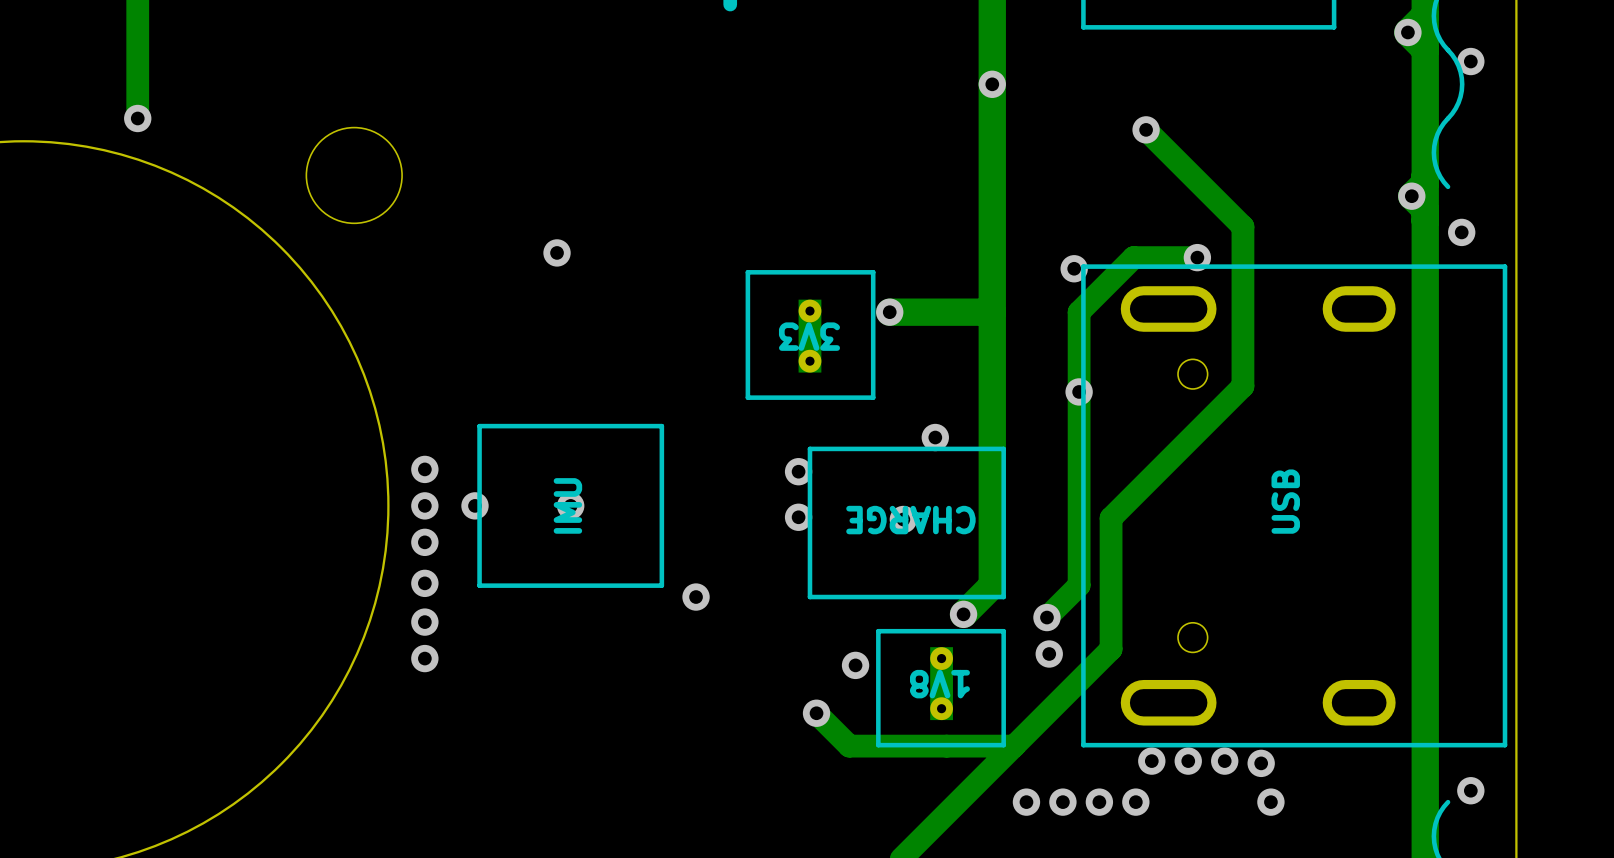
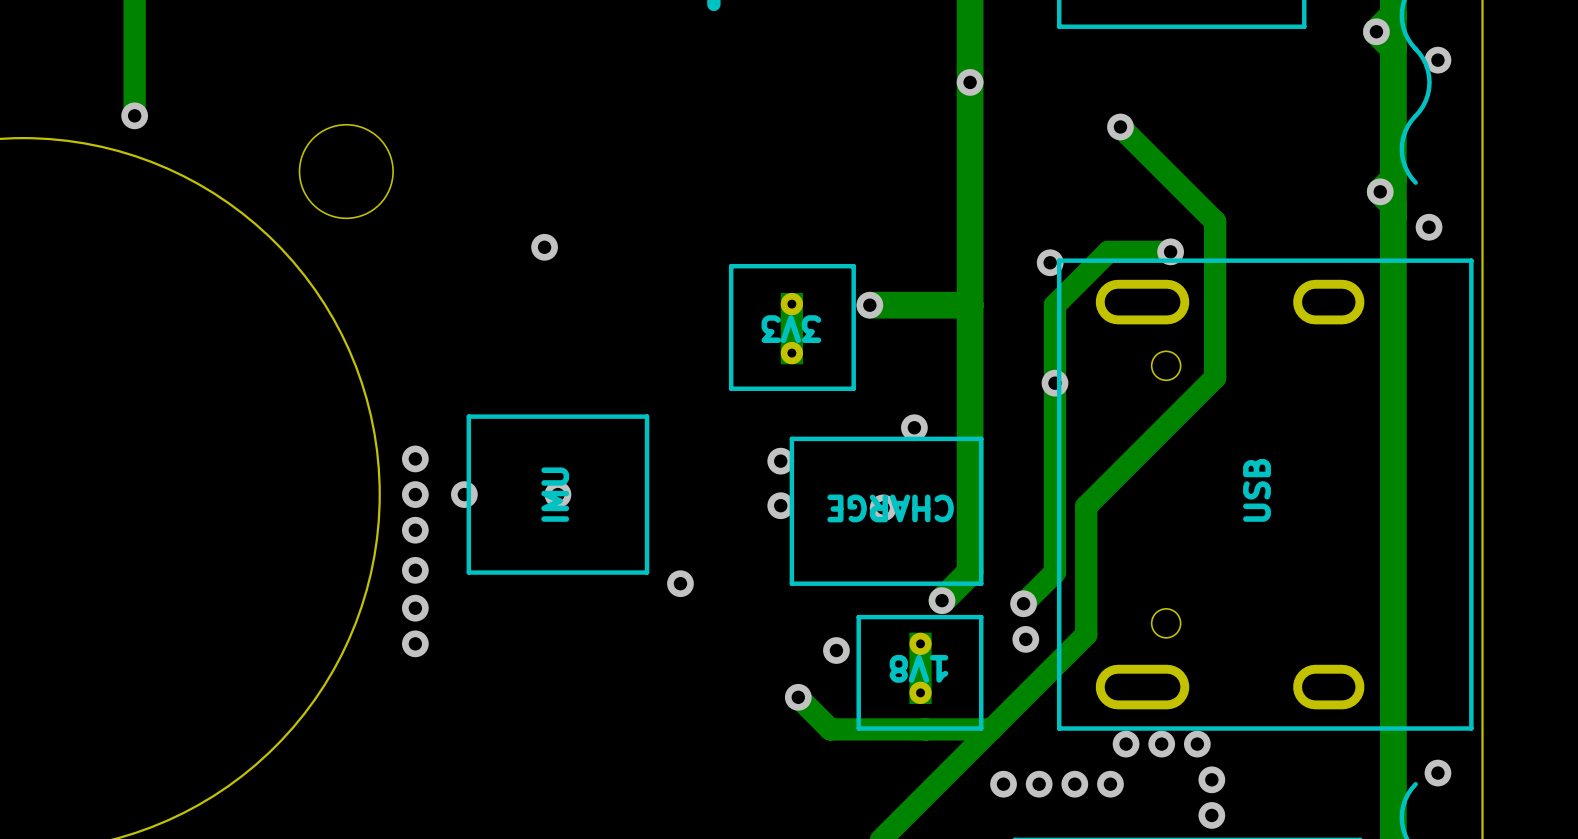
via: (1261, 763) -> none
via: none -> (1211, 779)
via: (1270, 802) -> none
via: none -> (1211, 815)

